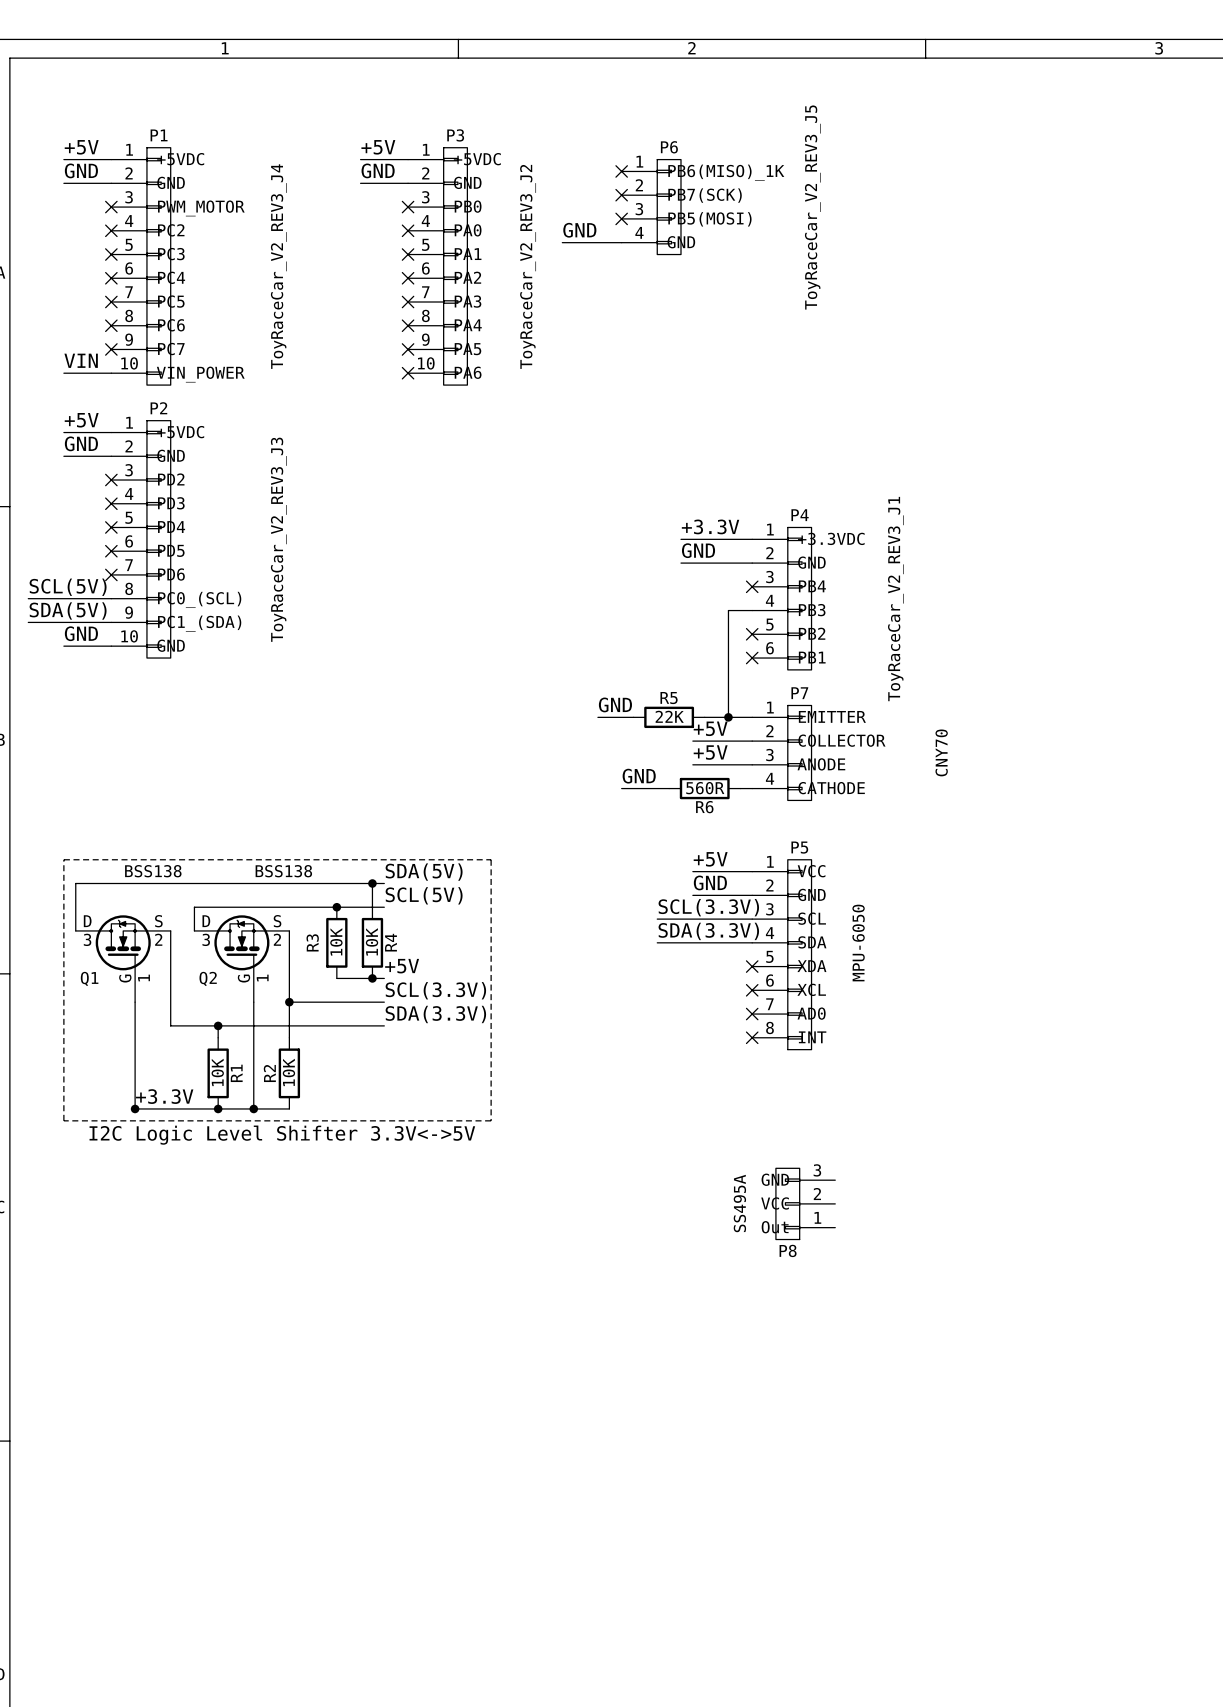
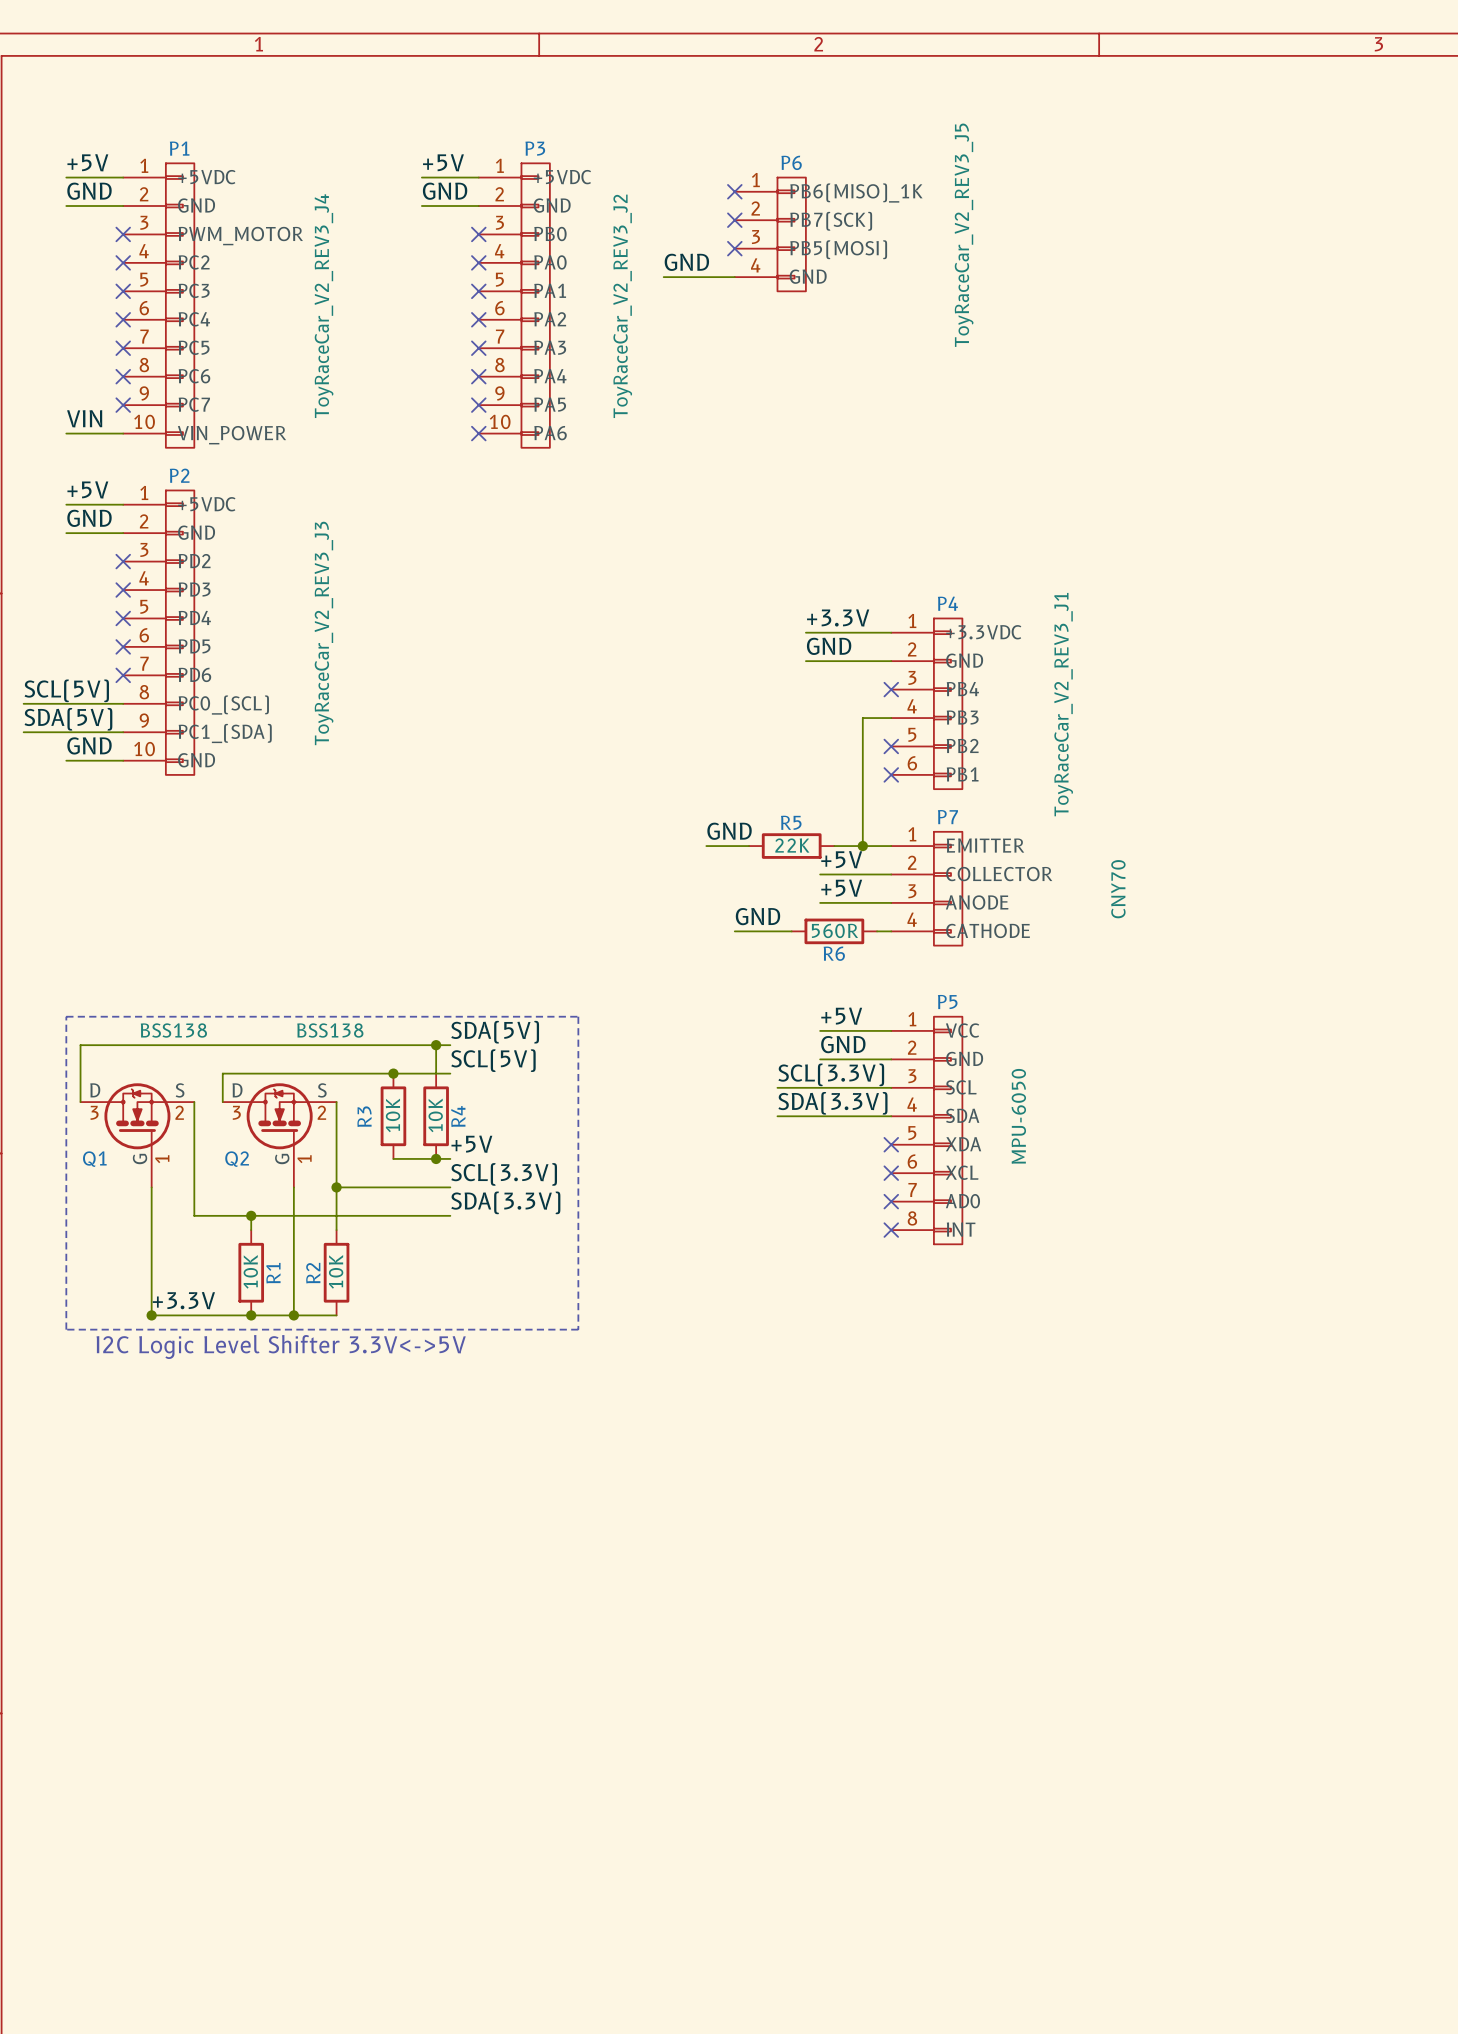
P8: SS495A (805, 1203) -> none

